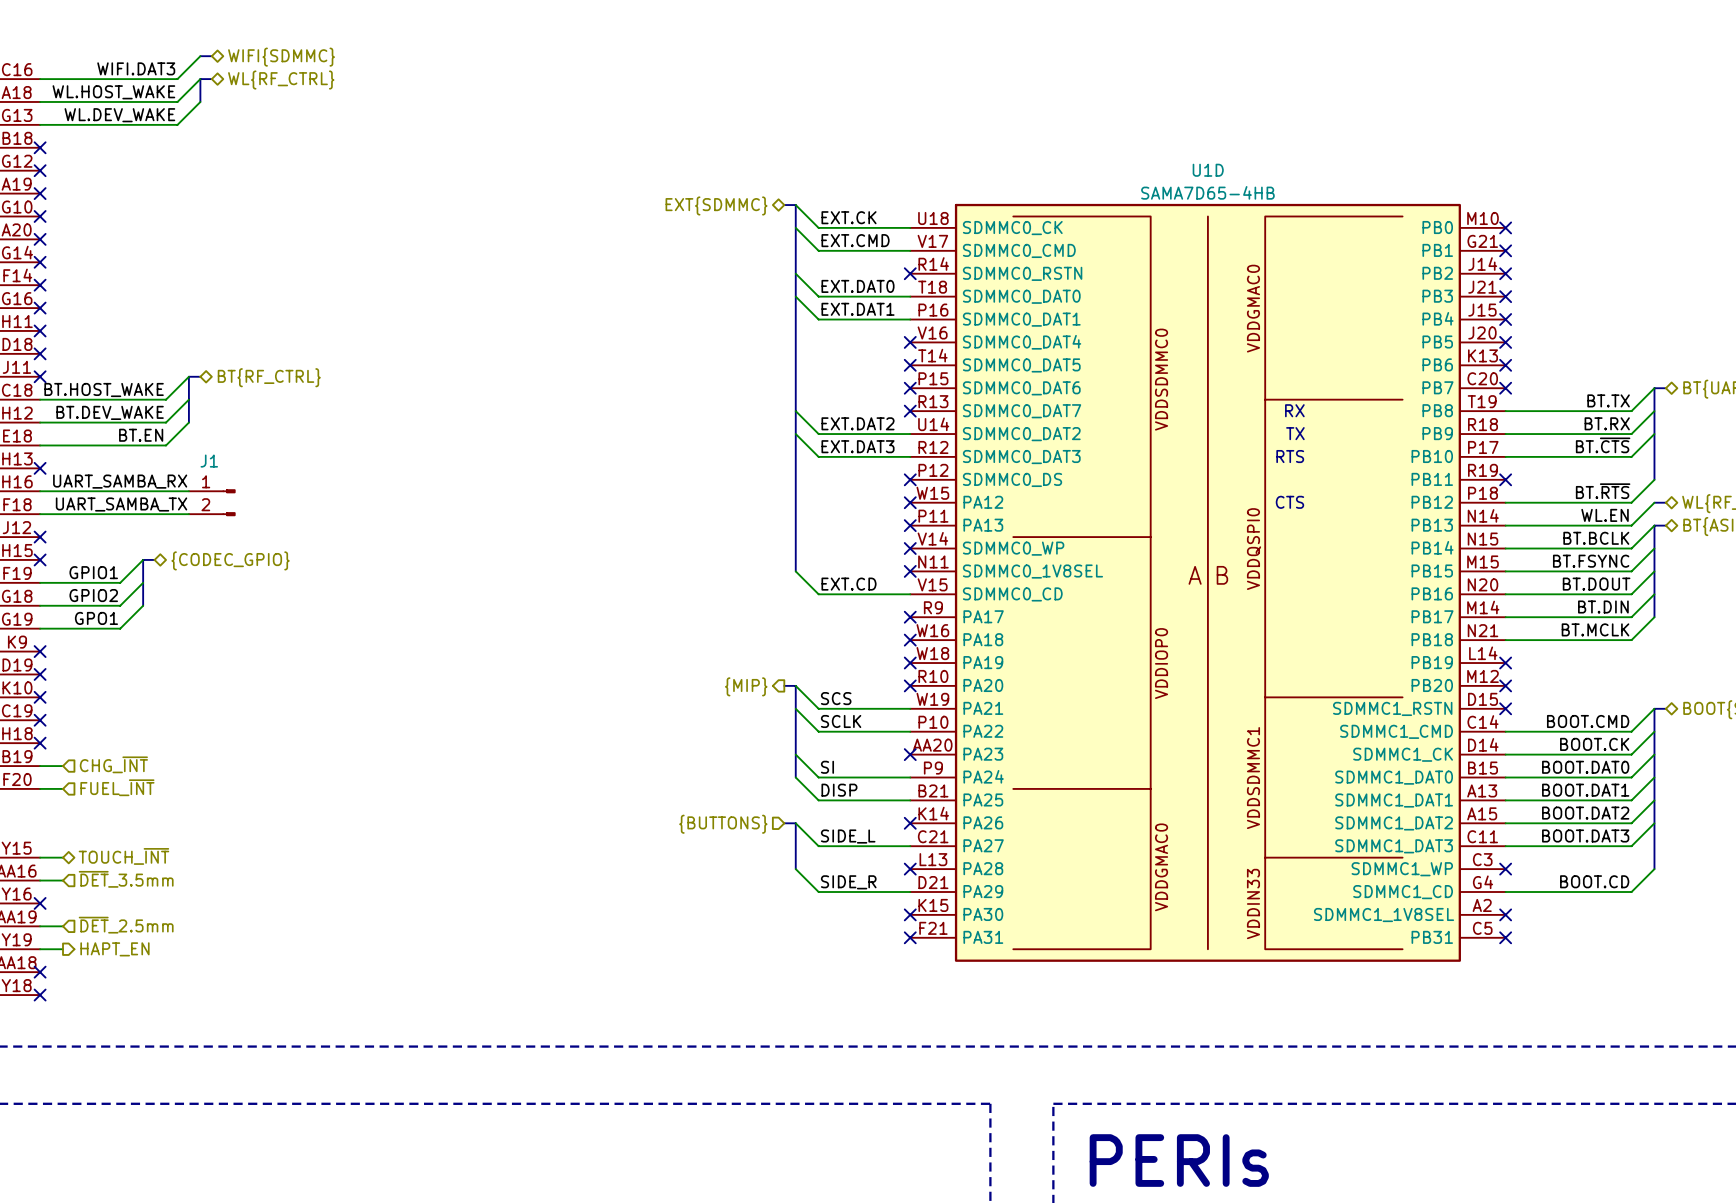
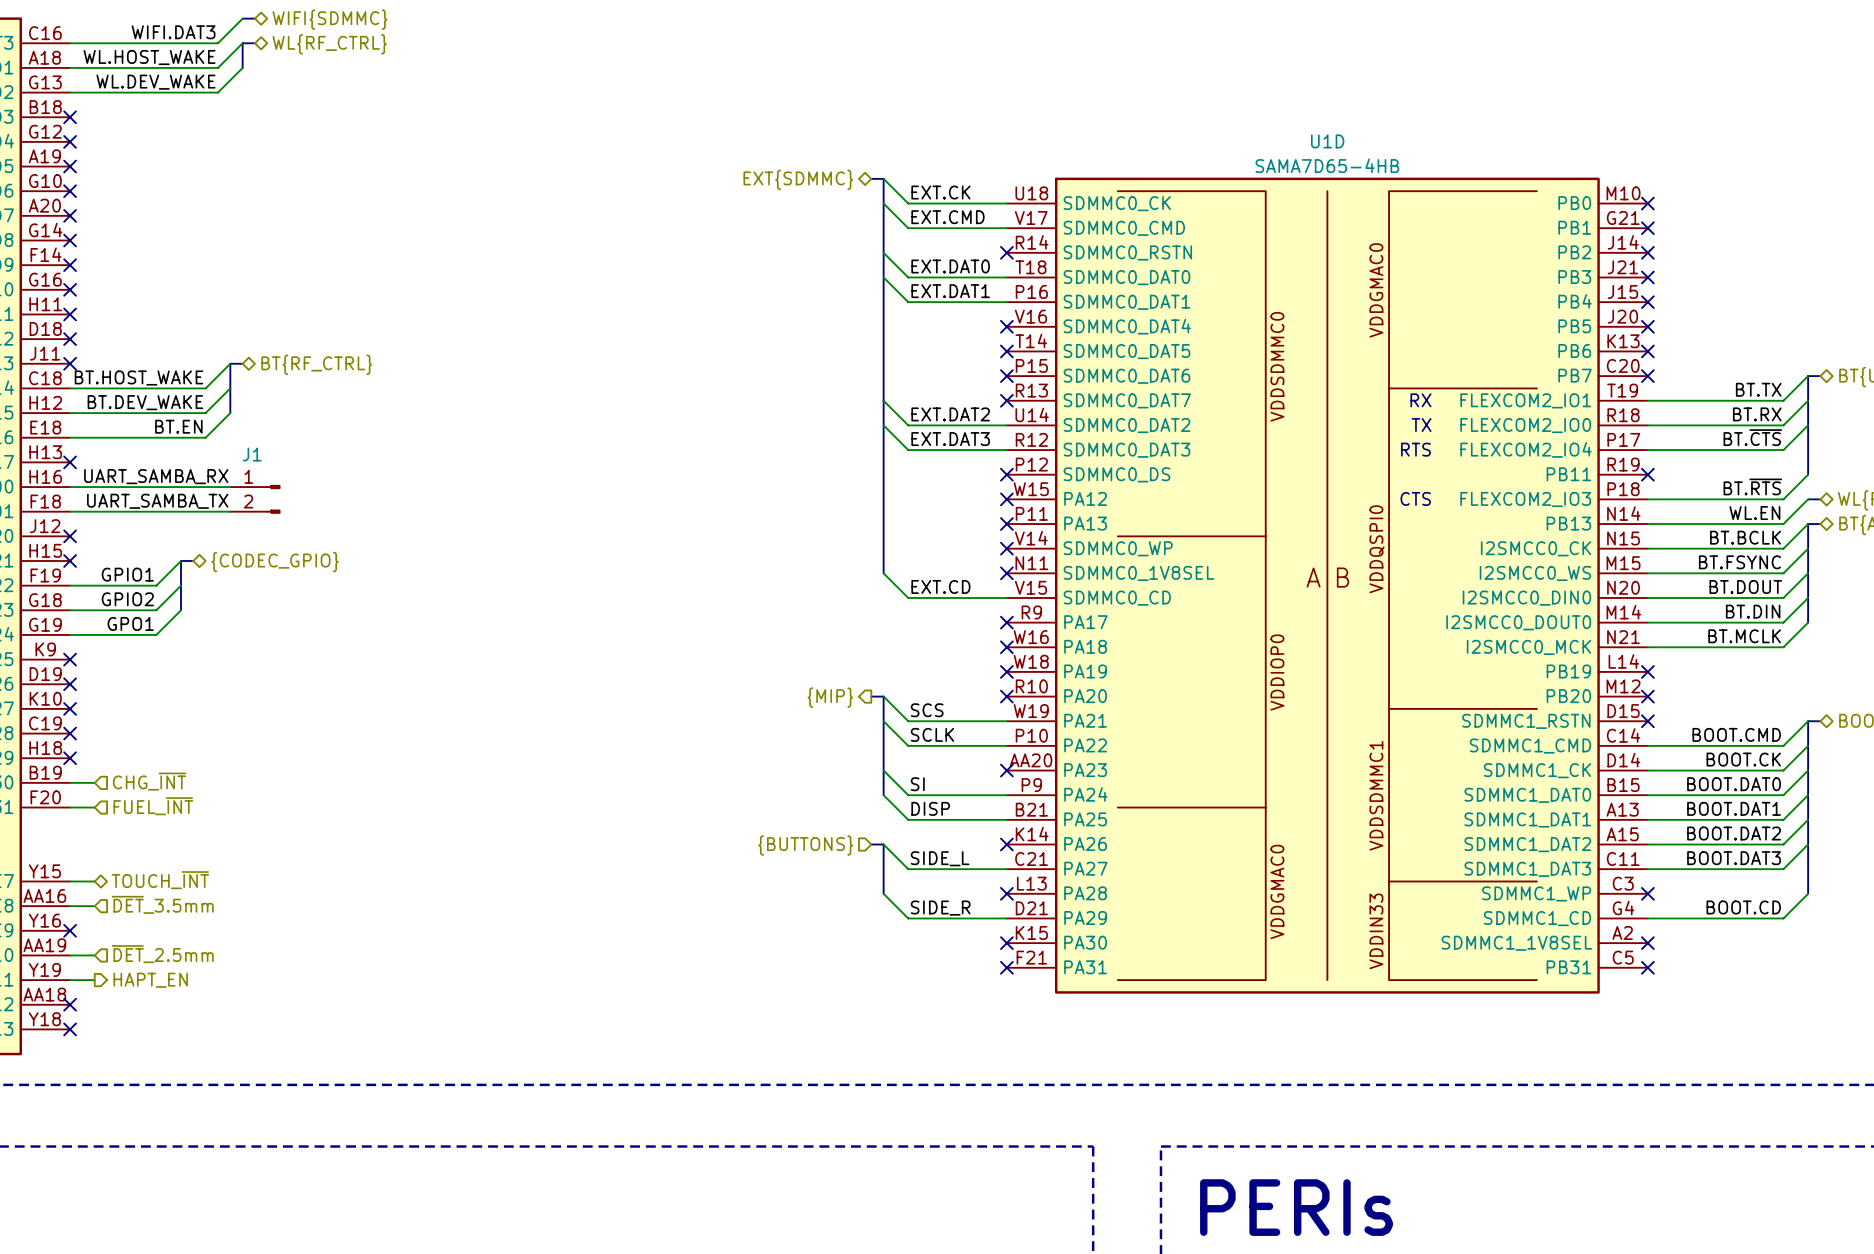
U1D symbol: [910, 203, 1506, 962] -> [1006, 177, 1648, 994]

